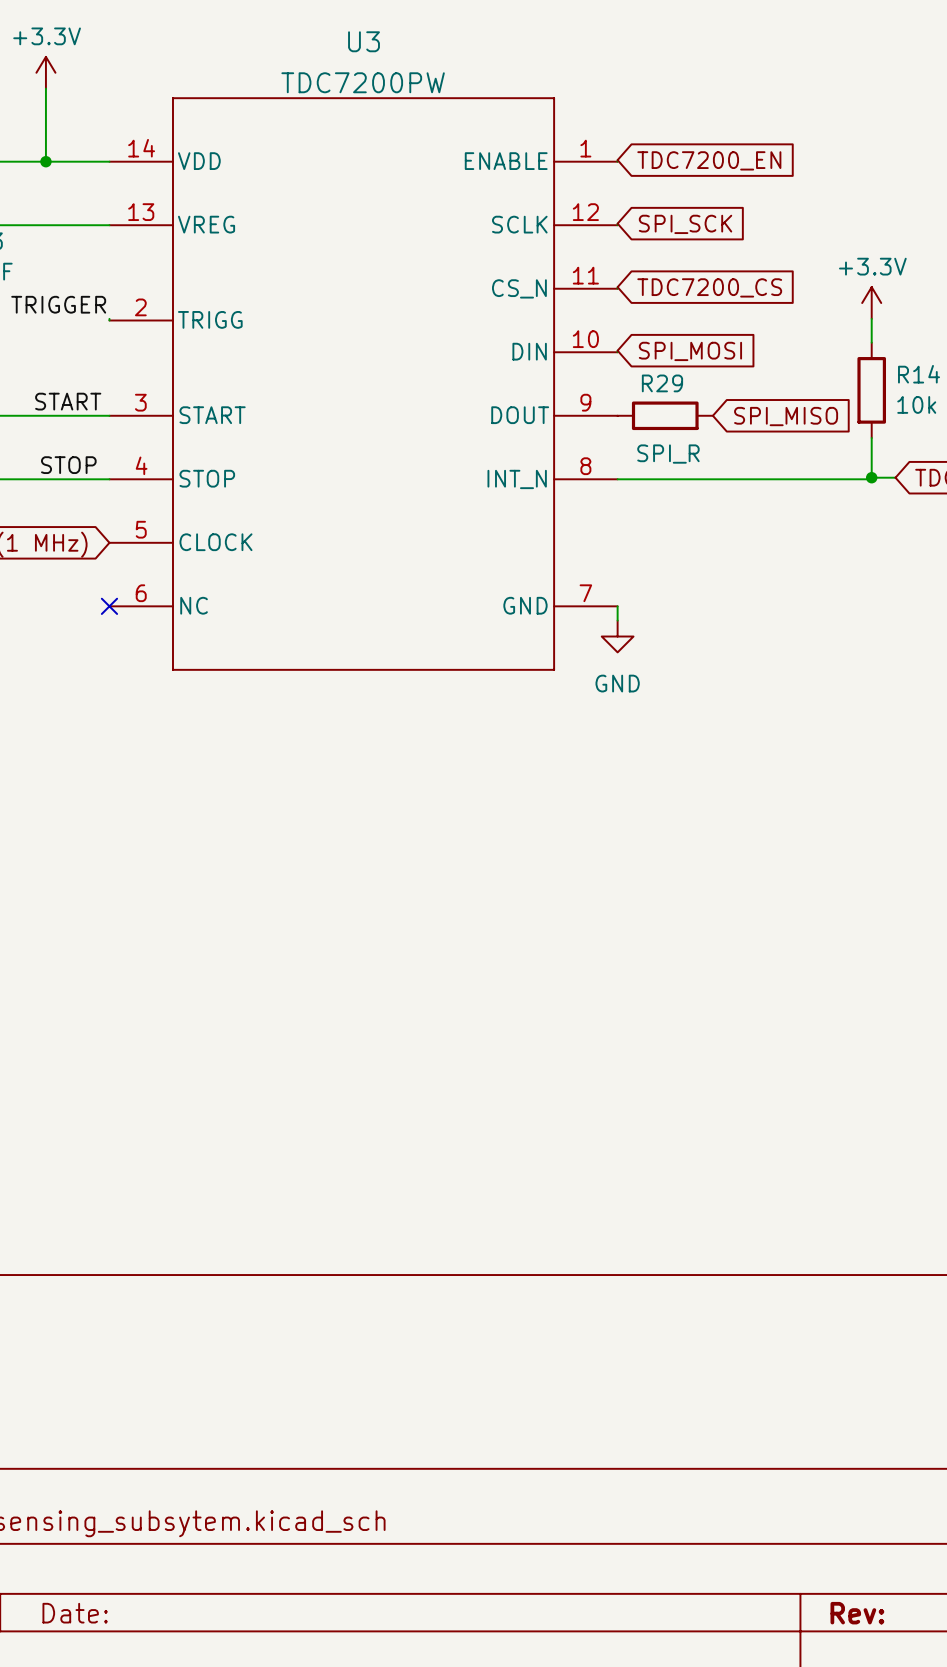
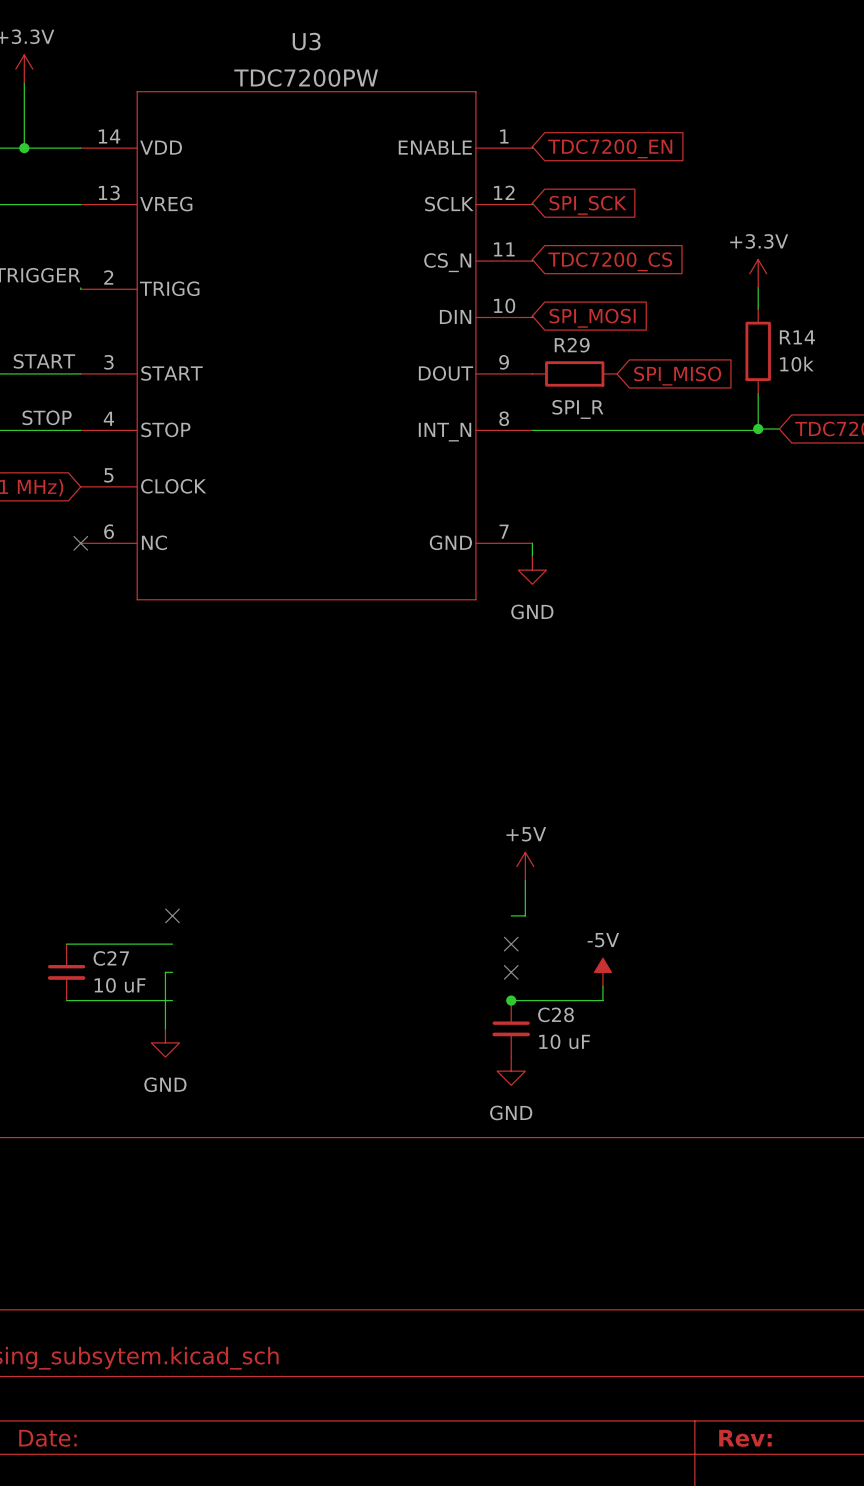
power symbol: none -> +5V (525, 866)
wire: none -> (525, 880) (525, 915) (511, 915)
no-connect mark: none -> (172, 915)
wire: none -> (66, 944) (172, 944)
no-connect mark: none -> (511, 944)
C27: none -> 10 uF (66, 972)
wire: none -> (172, 972) (165, 972) (165, 1028)
no-connect mark: none -> (511, 972)
power symbol: none -> -5V (602, 972)
wire: none -> (602, 986) (602, 1000) (511, 1000)
wire: none -> (66, 1000) (172, 1000)
junction: none -> (511, 1000)
C28: none -> 10 uF (511, 1028)
power symbol: none -> GND (165, 1042)
power symbol: none -> GND (511, 1071)

